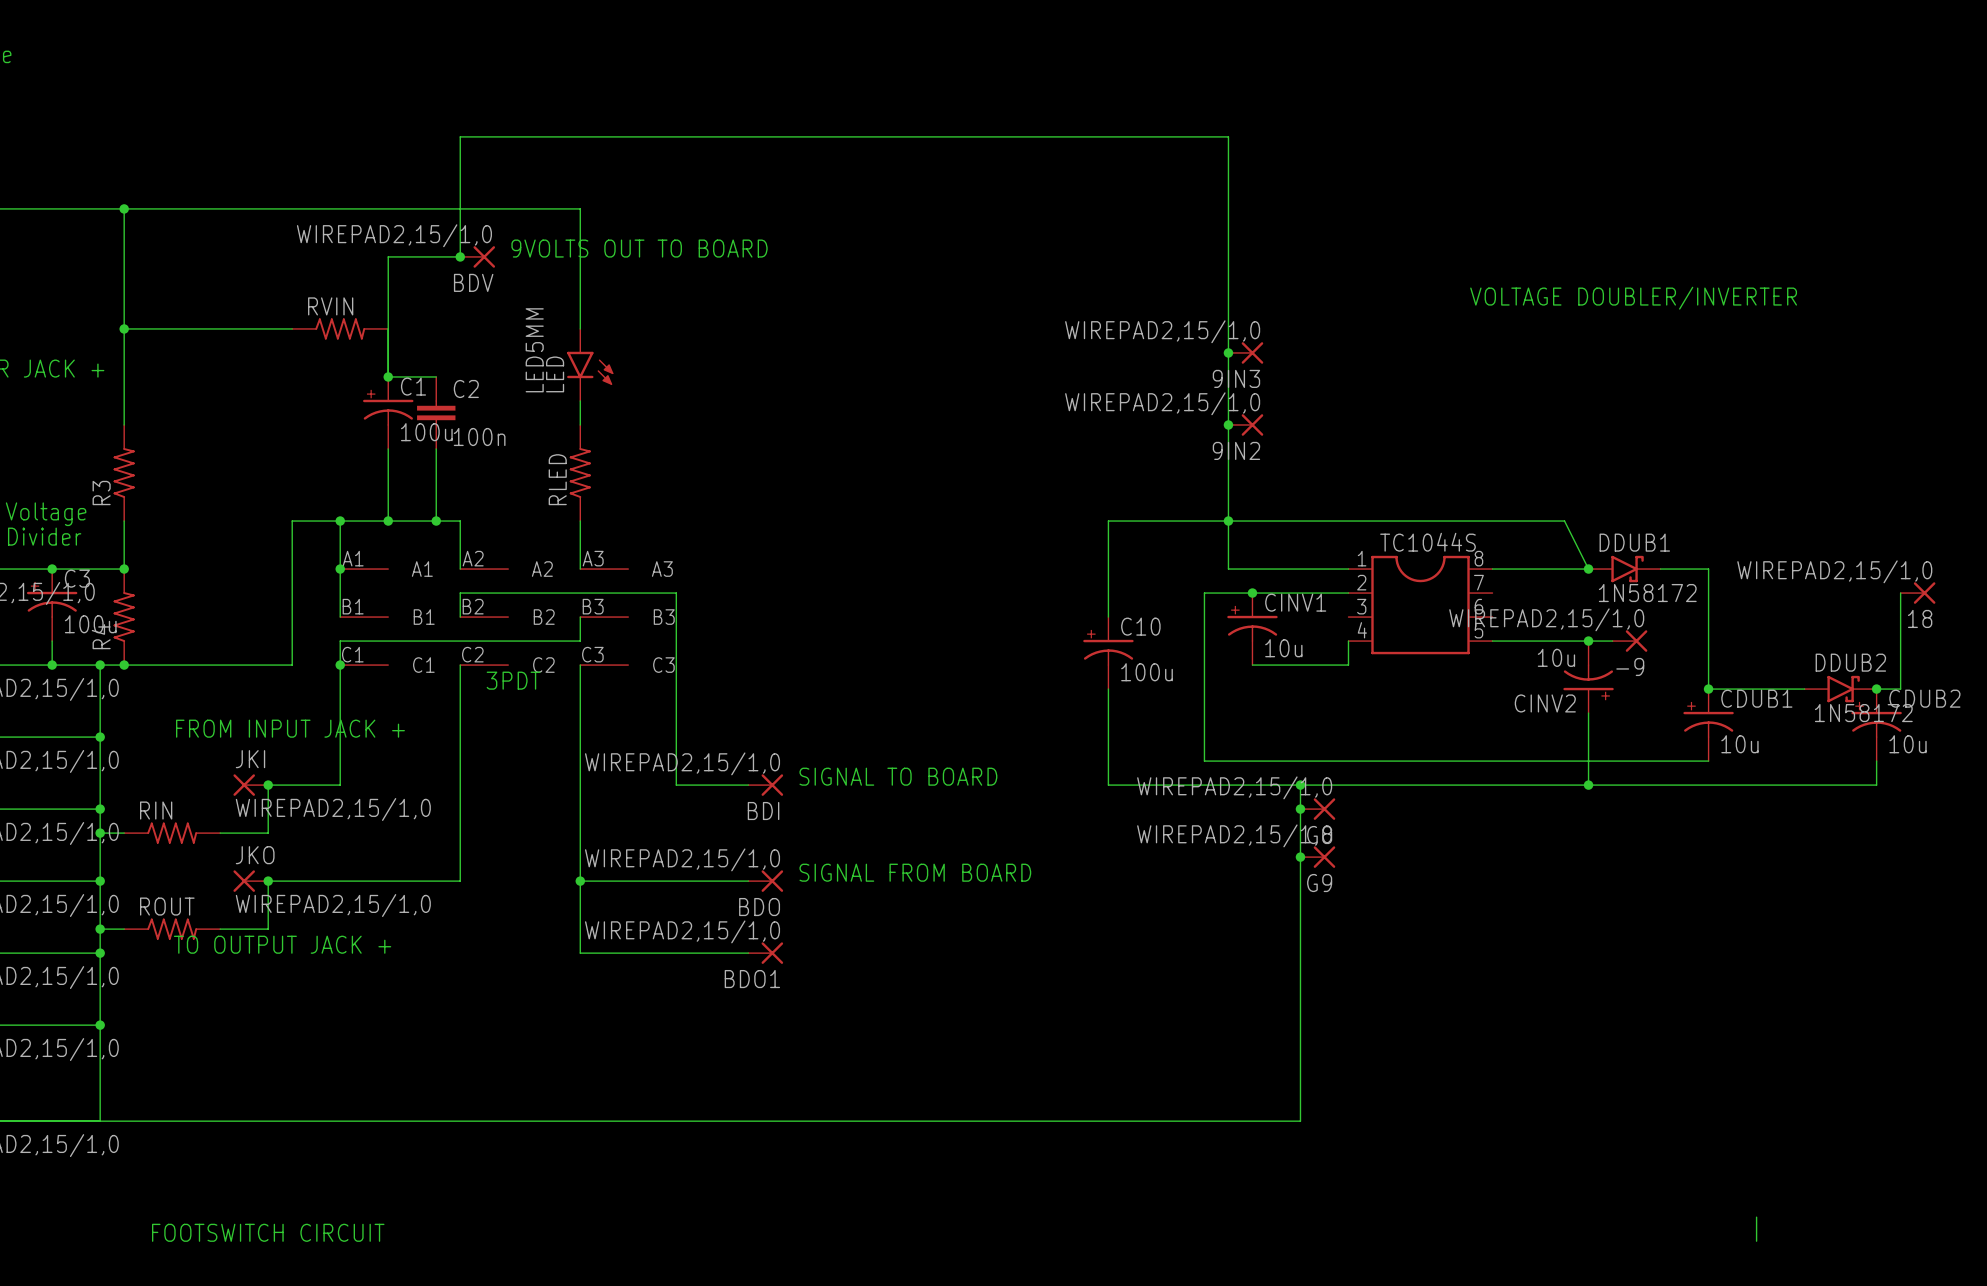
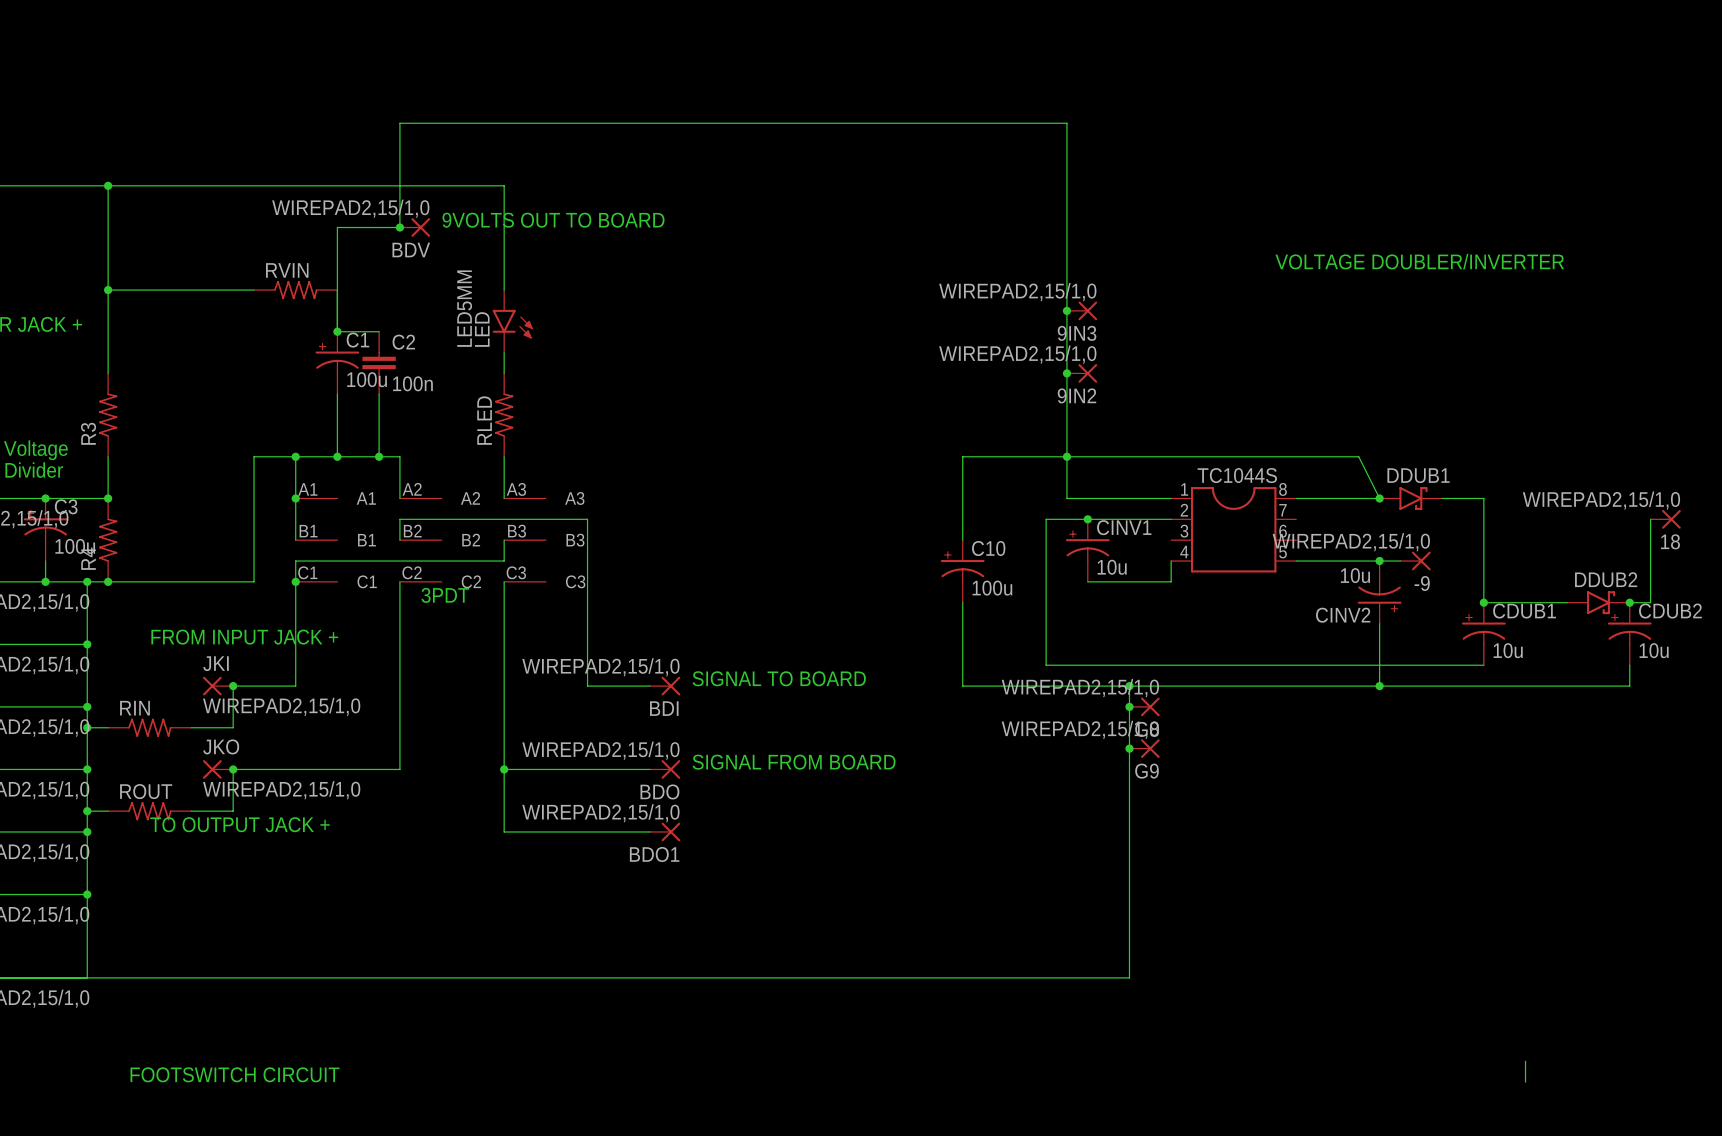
DDUB1 value: 1N58172 (1647, 593) -> none
DDUB2 value: 1N58172 (1863, 713) -> none

